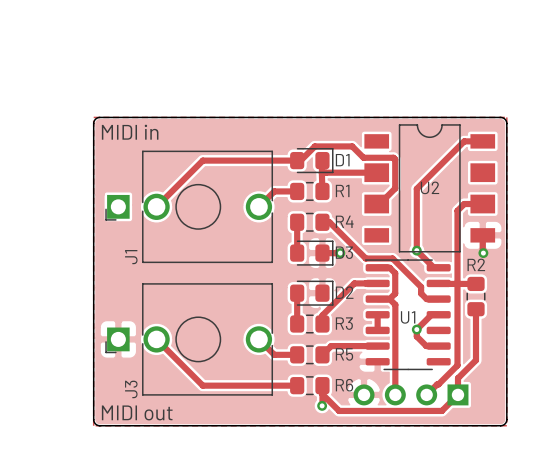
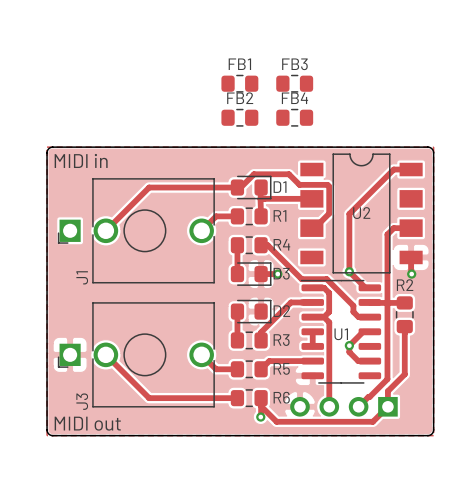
FB1: none -> (239, 83)
FB3: none -> (294, 83)
FB2: none -> (239, 117)
FB4: none -> (294, 117)

